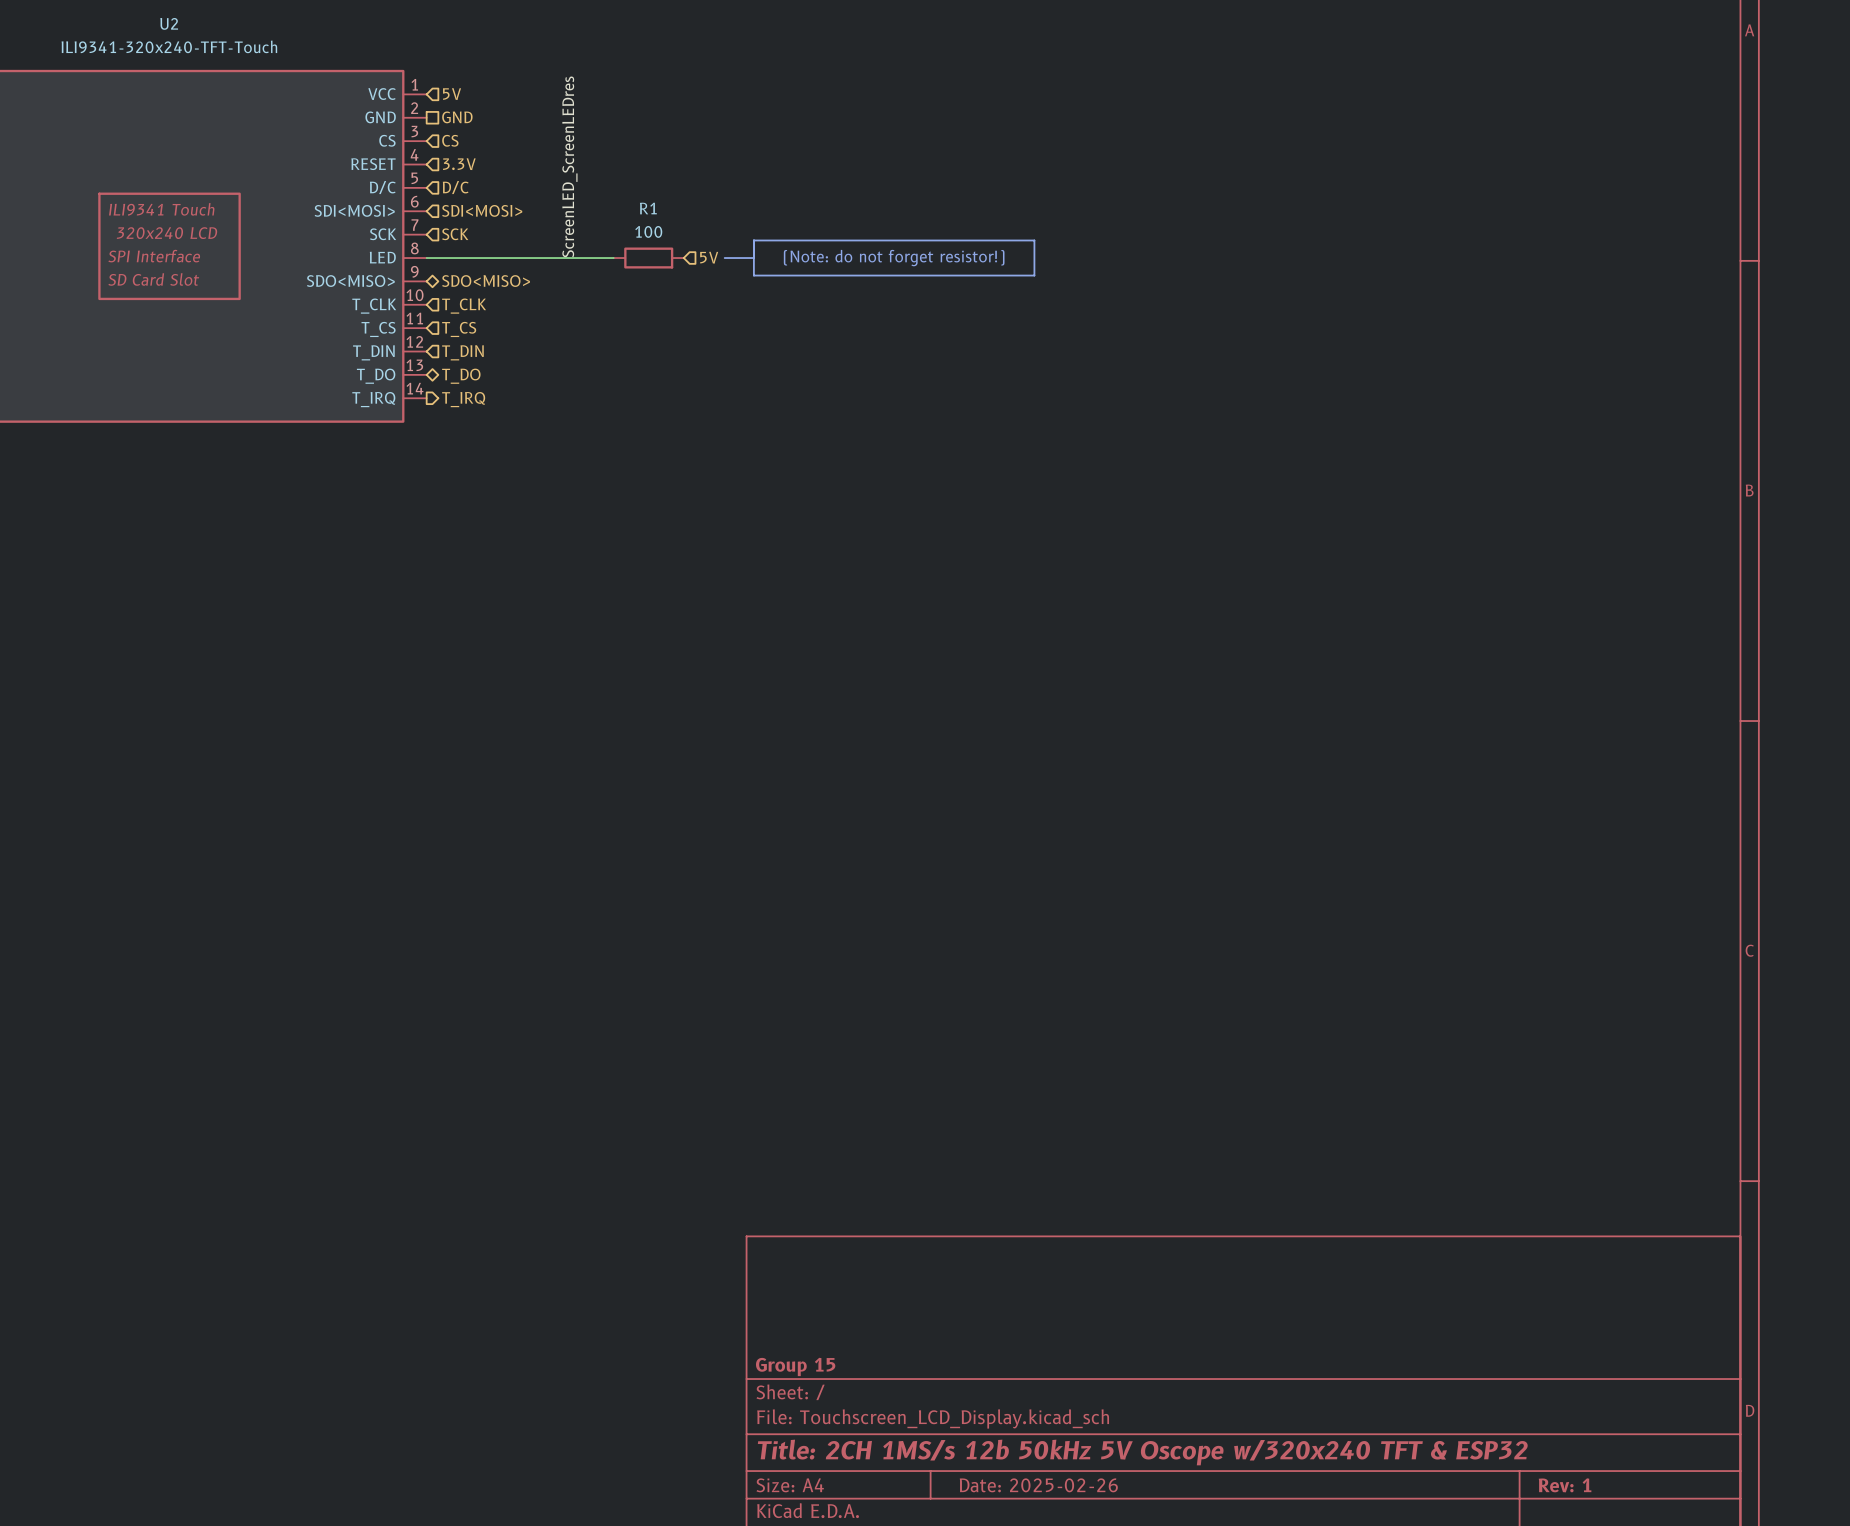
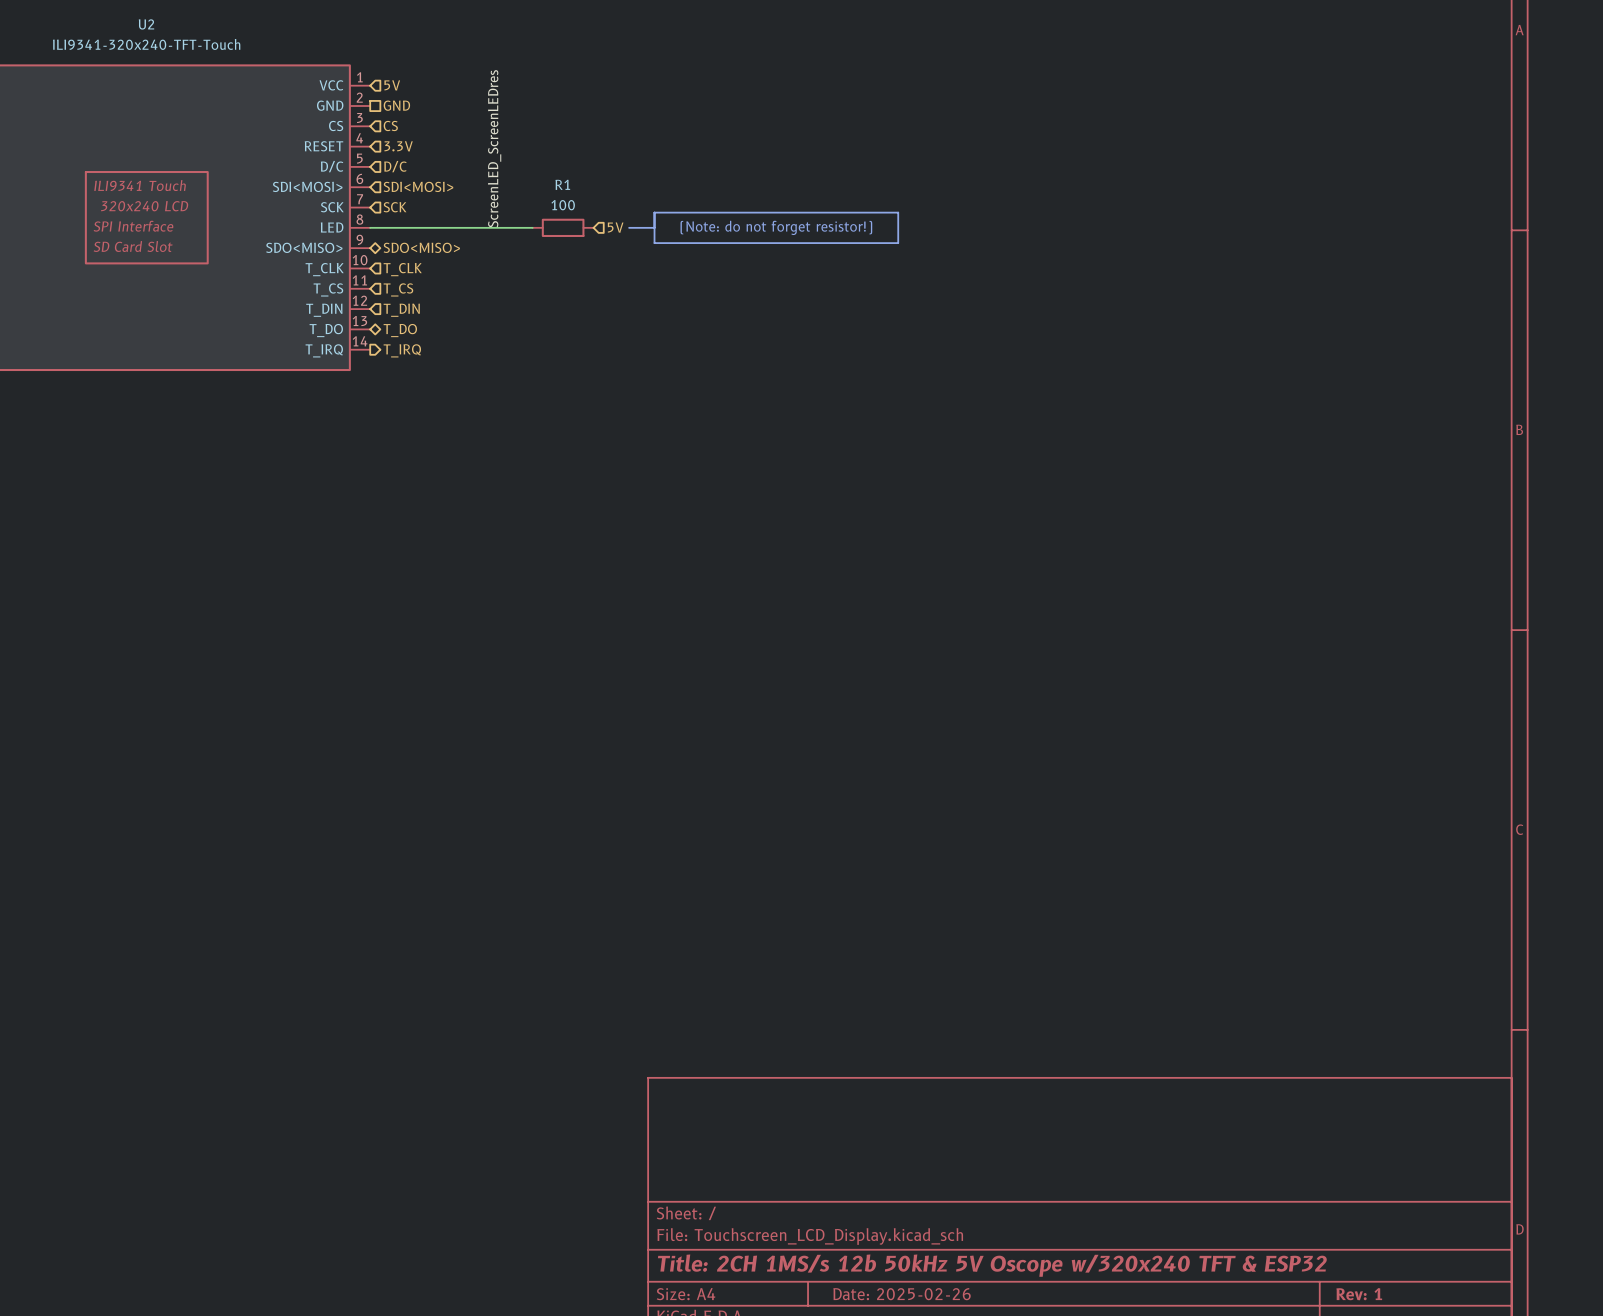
title block: Group 15 (795, 1366) -> none

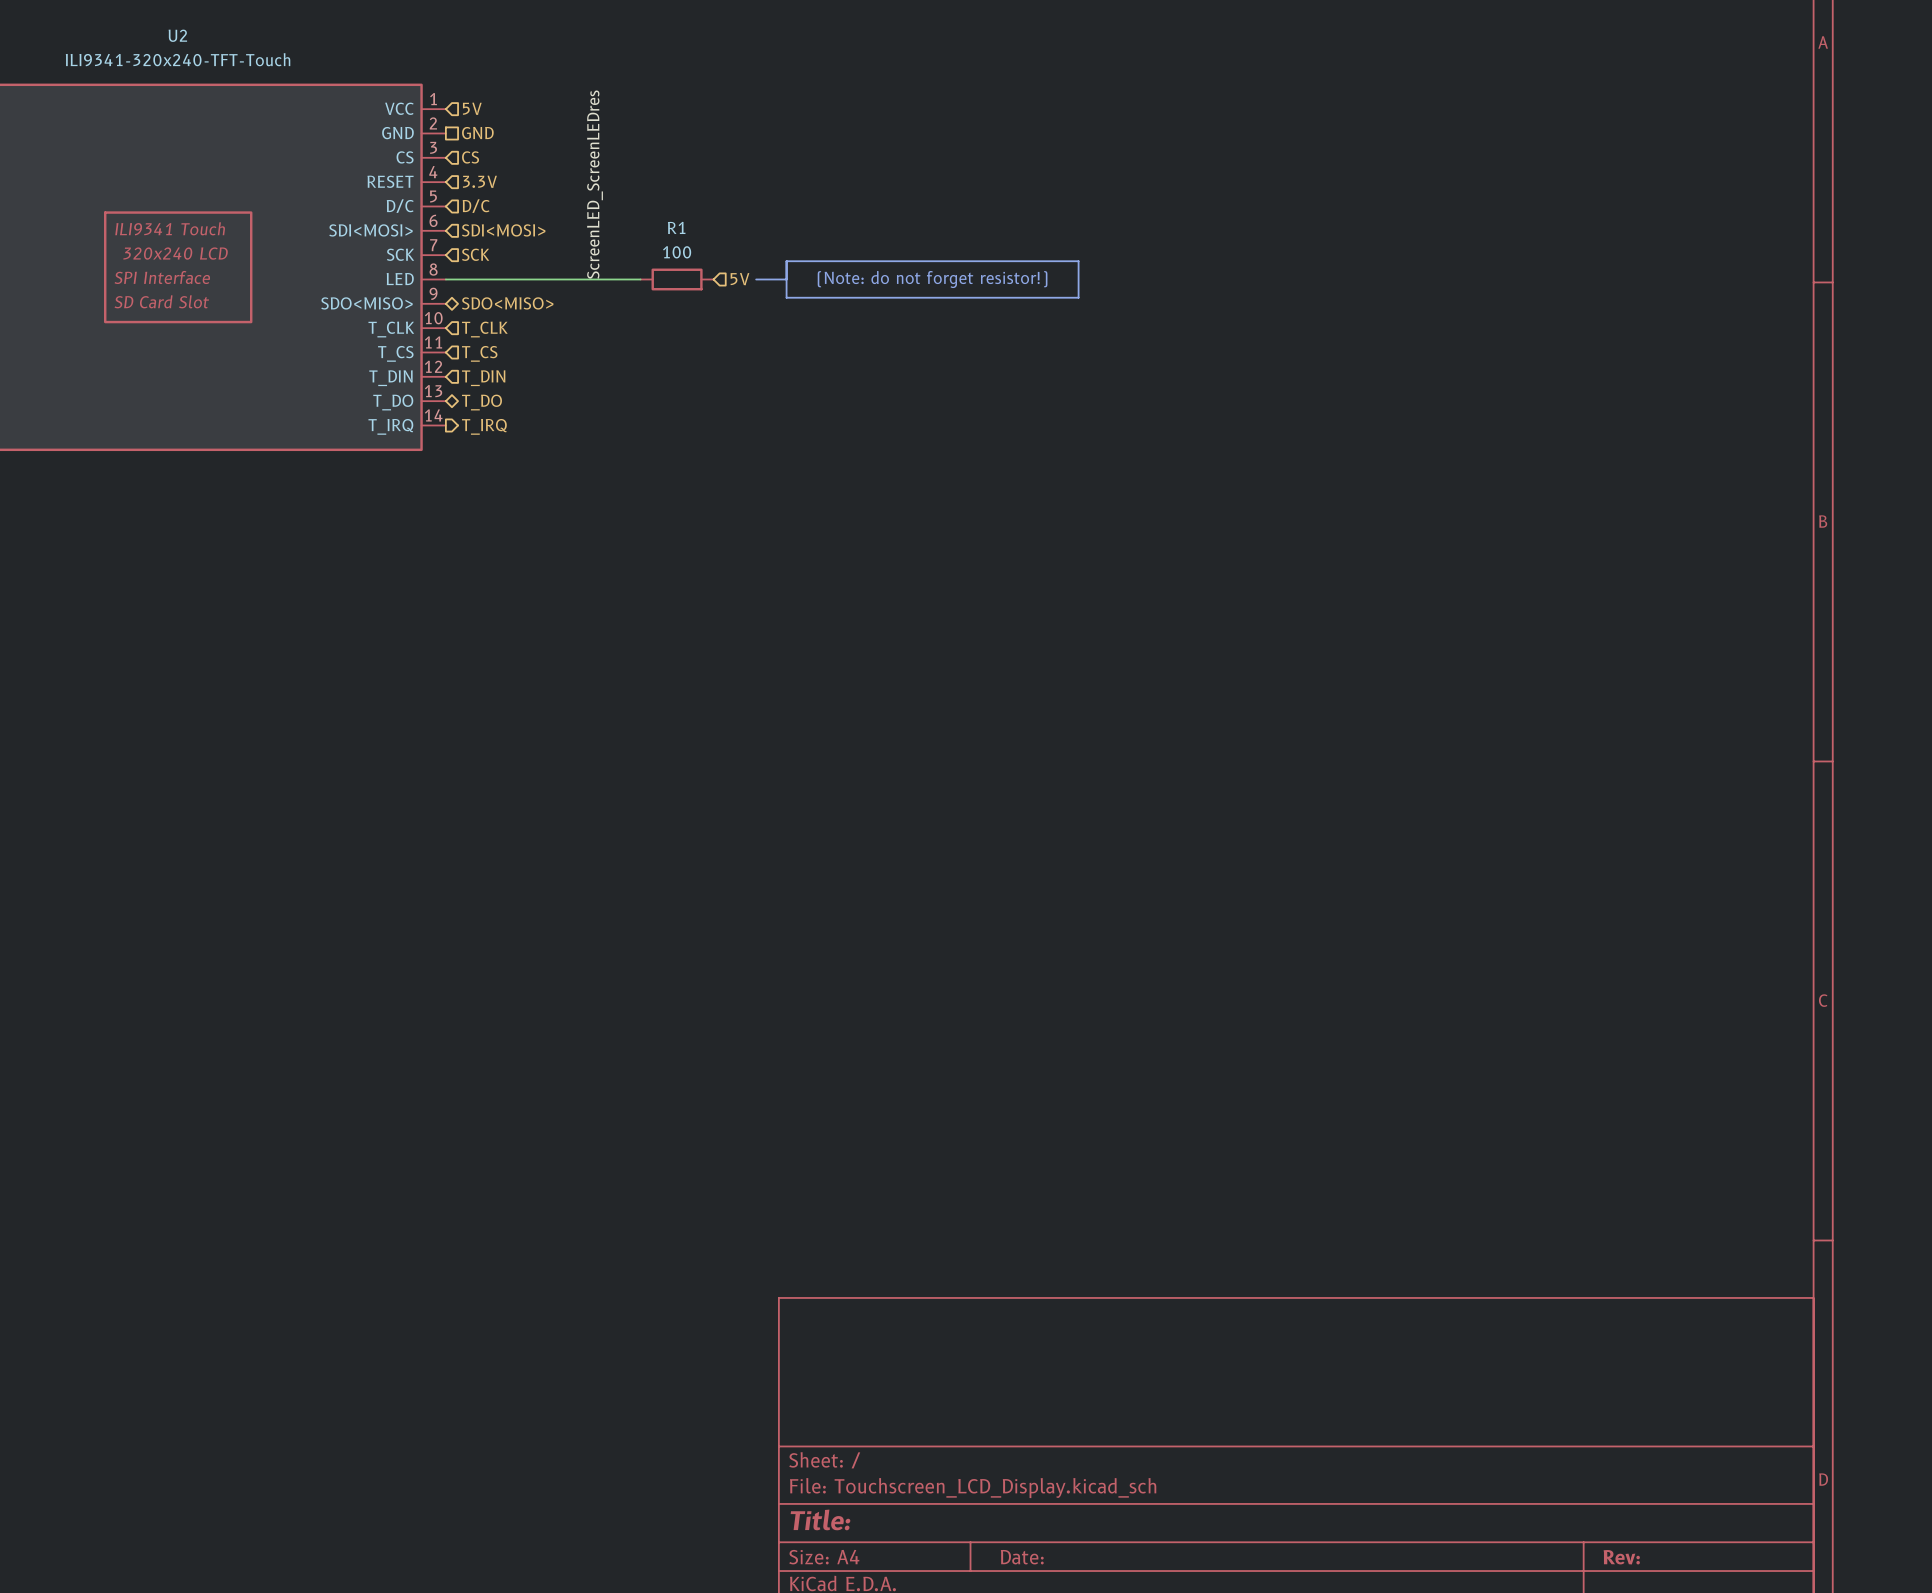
title block: Title: 2CH 1MS/s 12b 50kHz 5V Oscope w/320x240 TFT & ESP32 (992, 1265) -> Title: (820, 1519)
title block: Date: 2025-02-26 (902, 1294) -> Date: (1022, 1557)
title block: Rev: 1 (1359, 1294) -> Rev: (1621, 1557)

